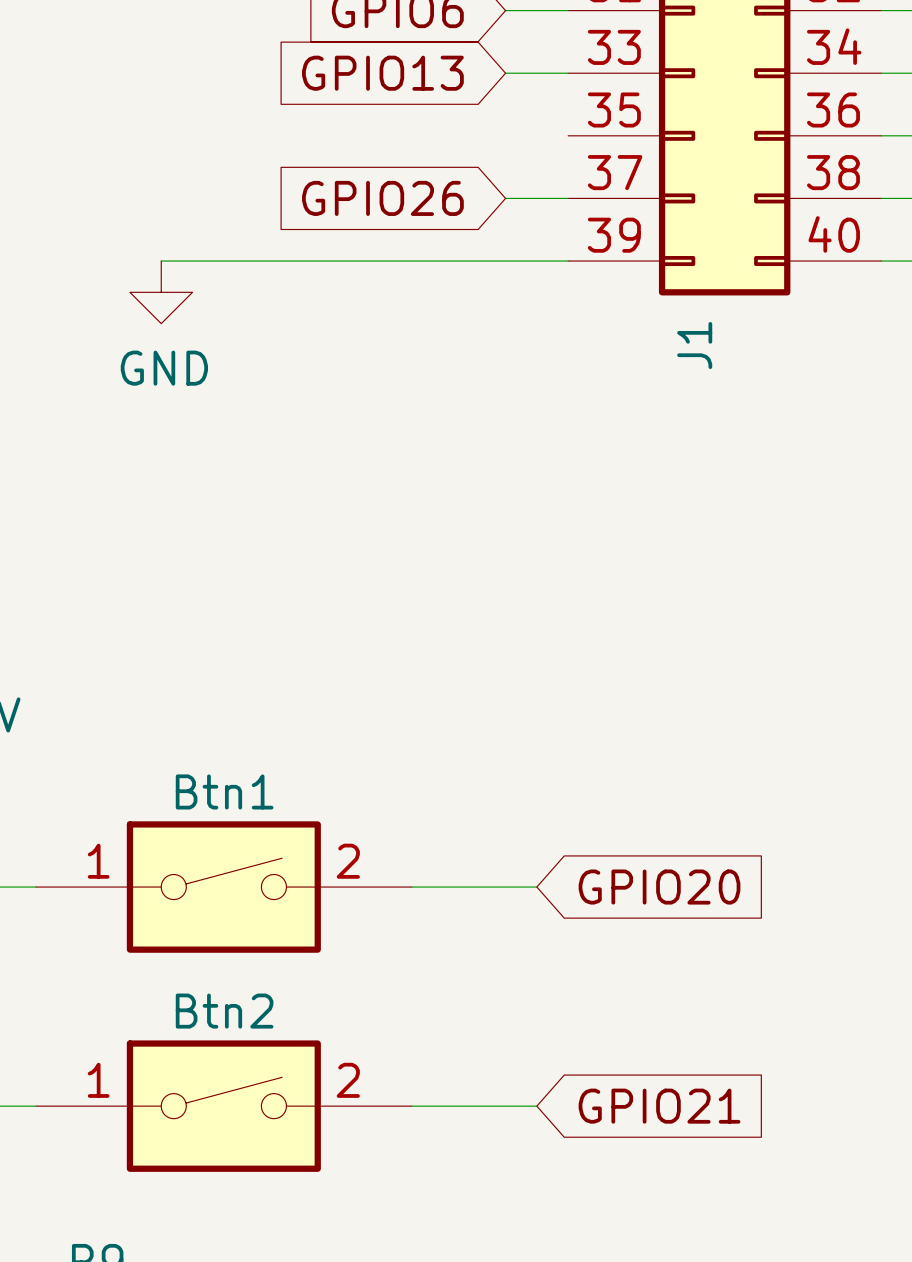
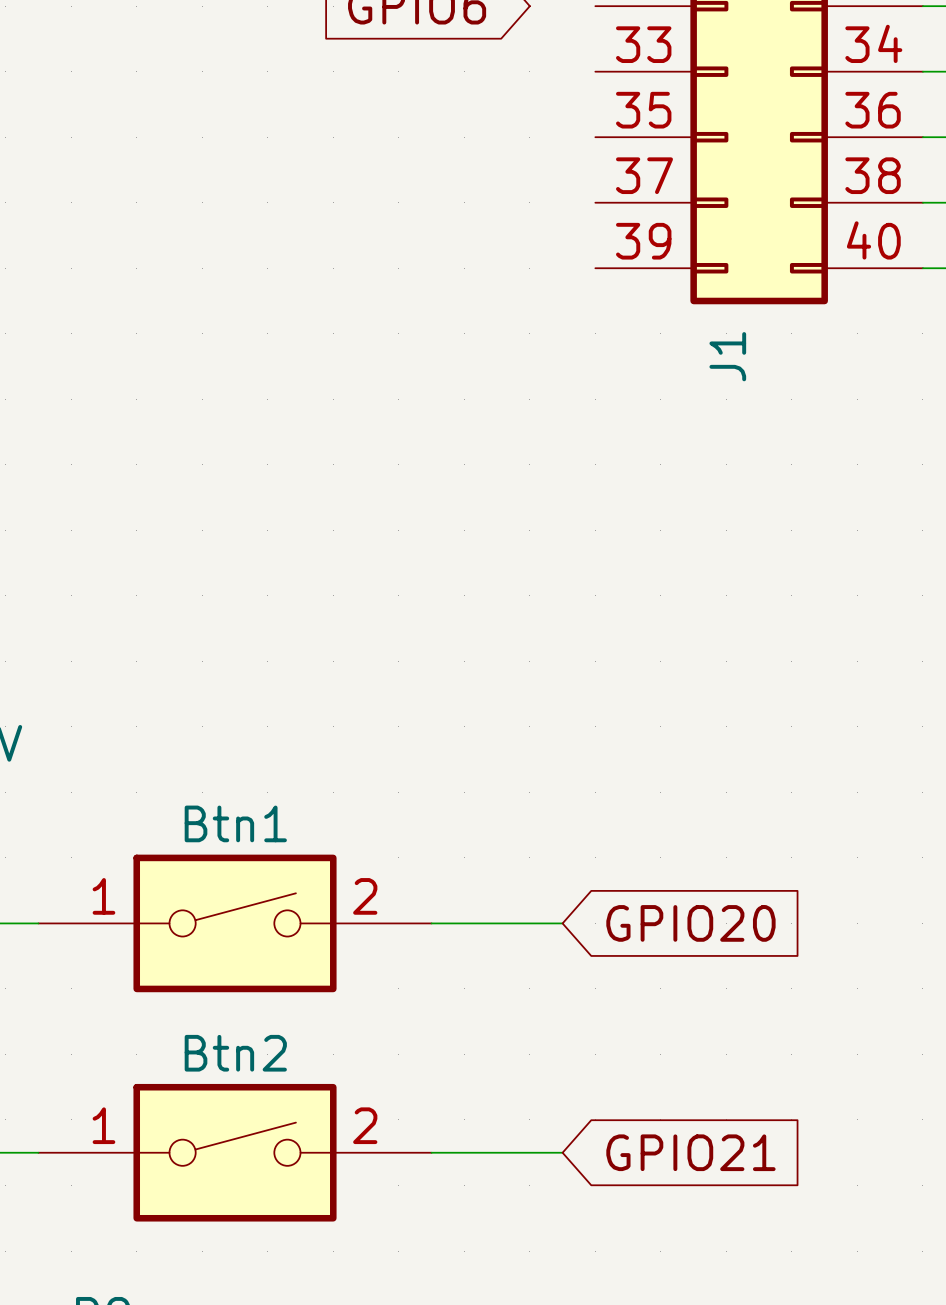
wire: (505, 10) (568, 10) -> none
global label: GPIO13 (382, 73) -> none
wire: (505, 73) (568, 73) -> none
global label: GPIO26 (382, 198) -> none
wire: (505, 198) (568, 198) -> none
wire: (161, 261) (568, 261) -> none
power symbol: GND (161, 292) -> none

